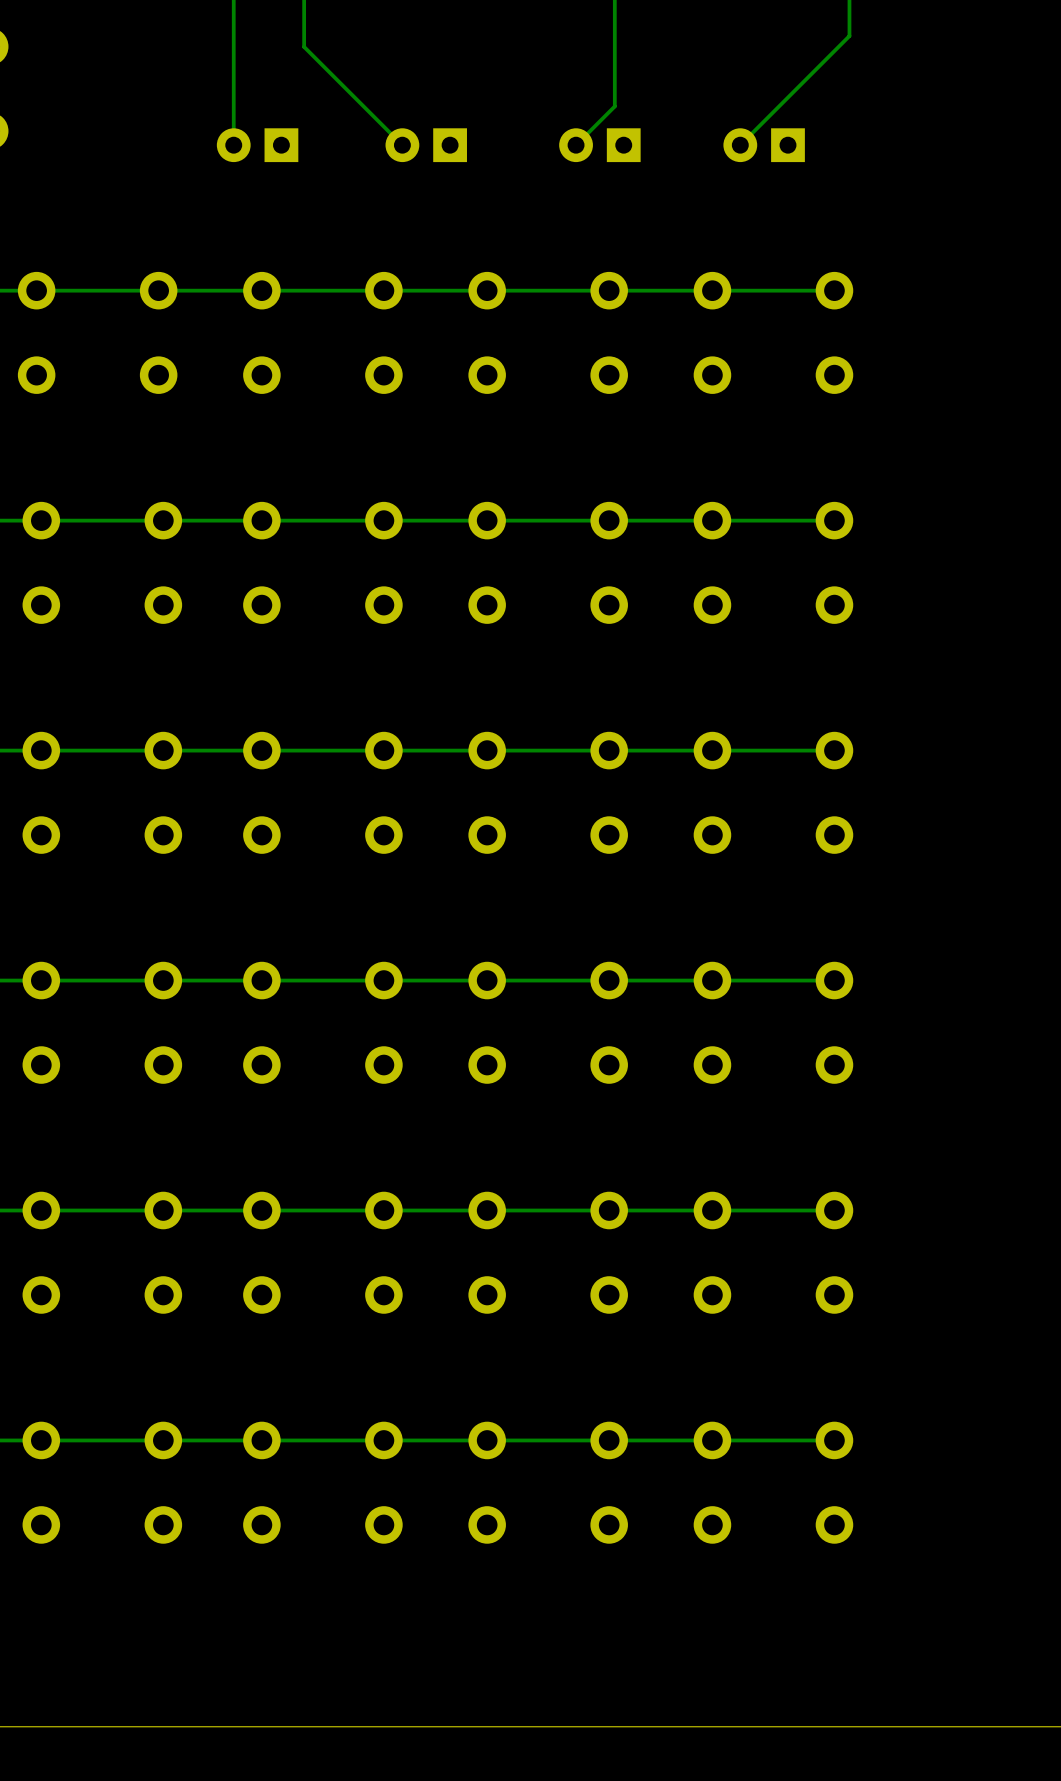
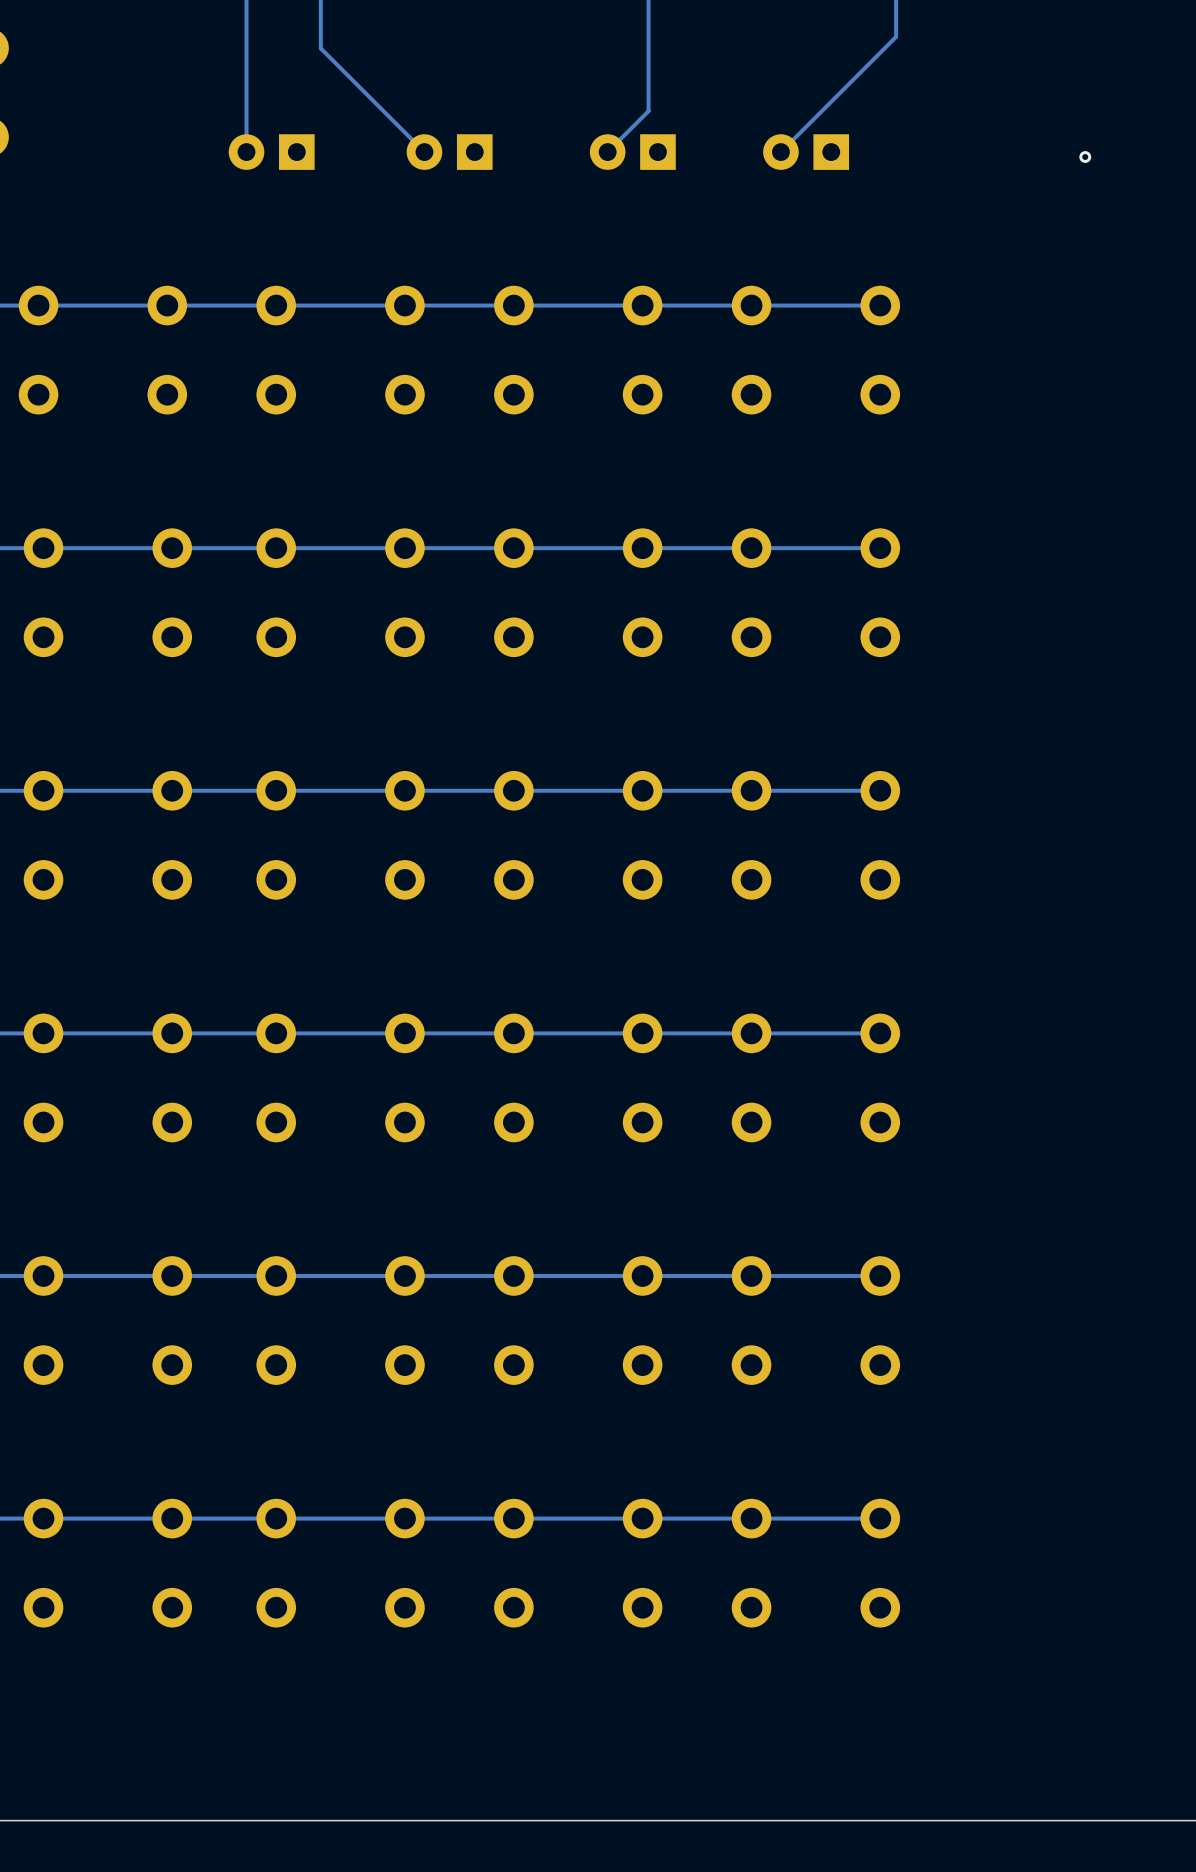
via: none -> (1085, 157)

